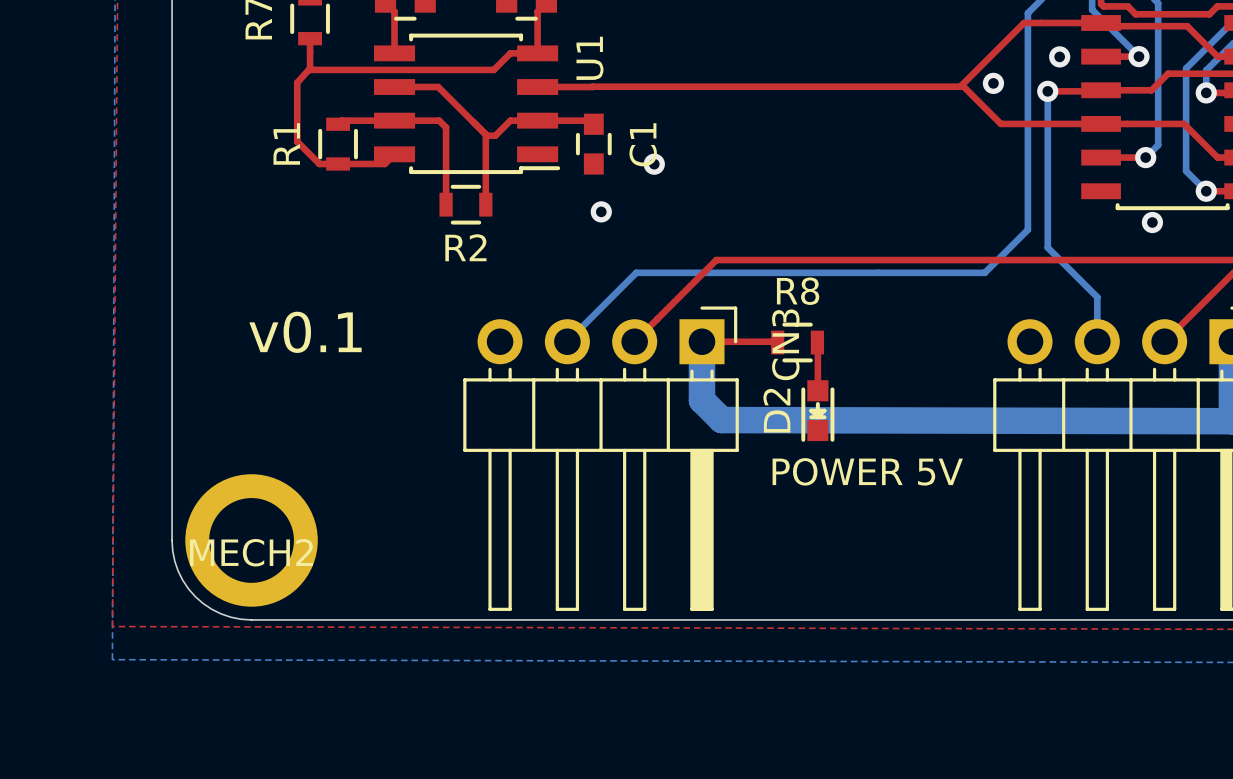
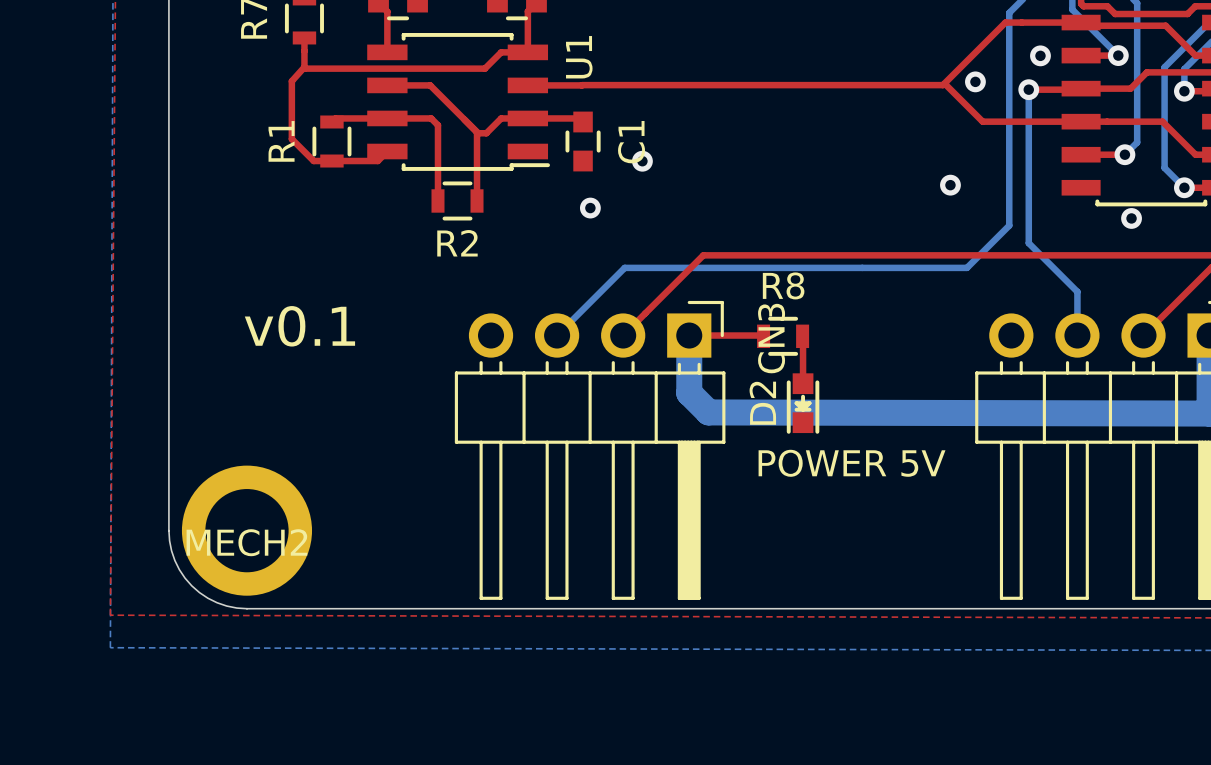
via: none -> (950, 185)

